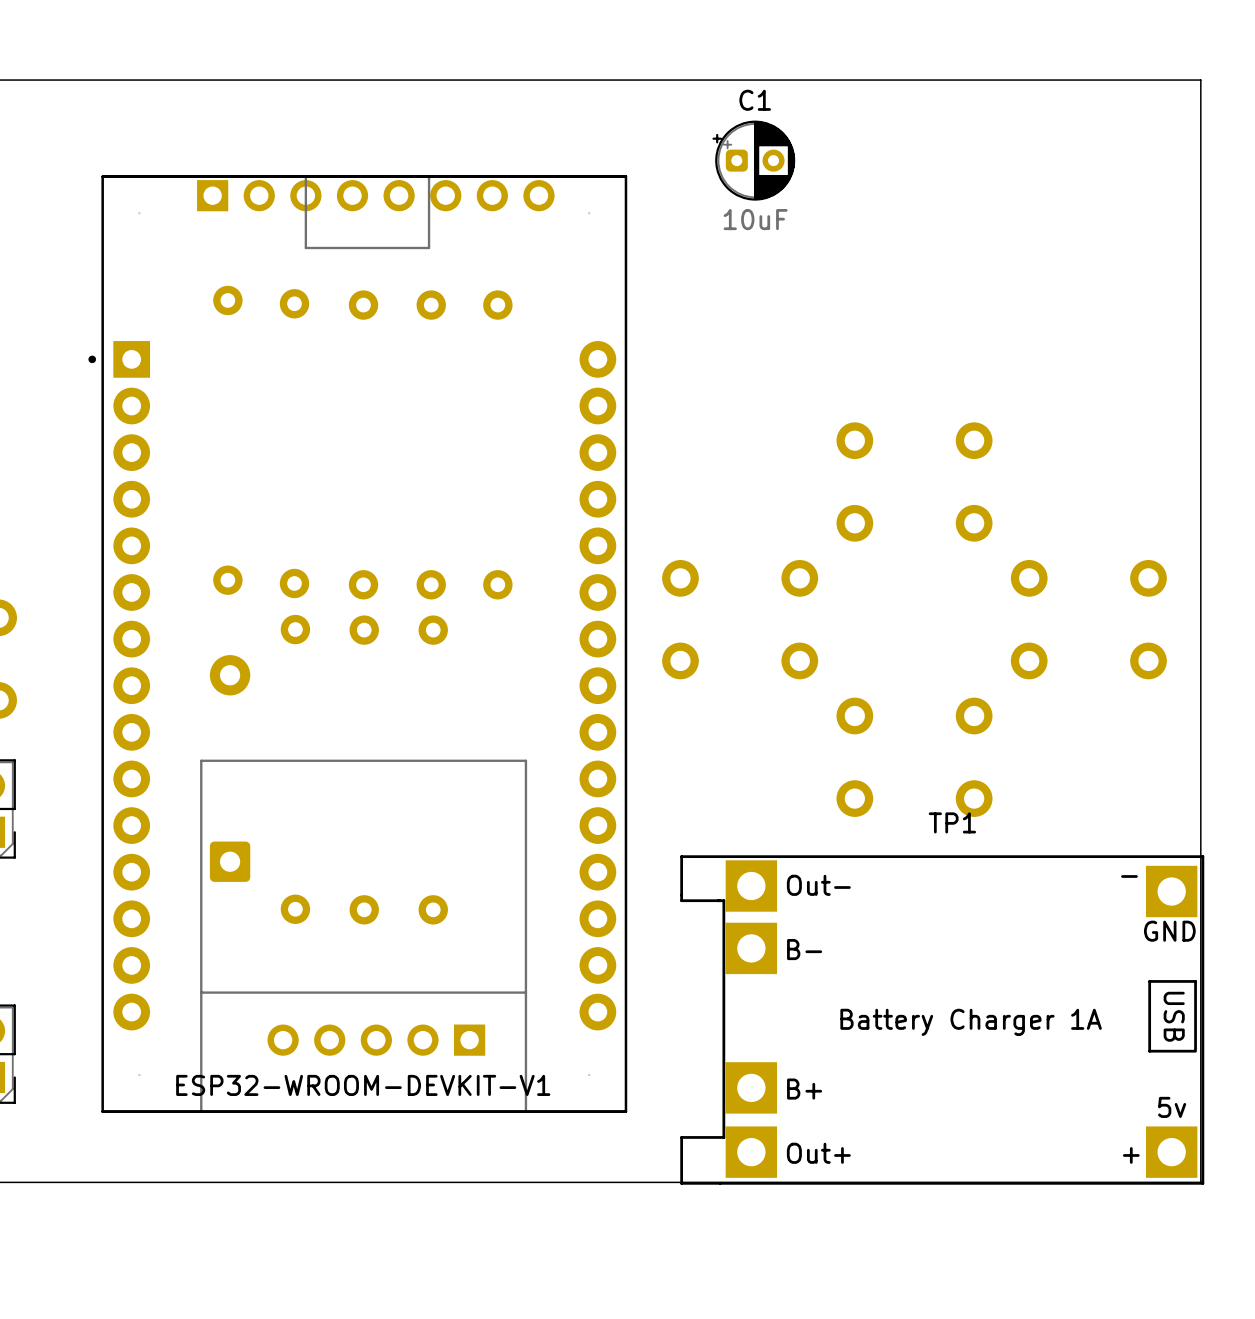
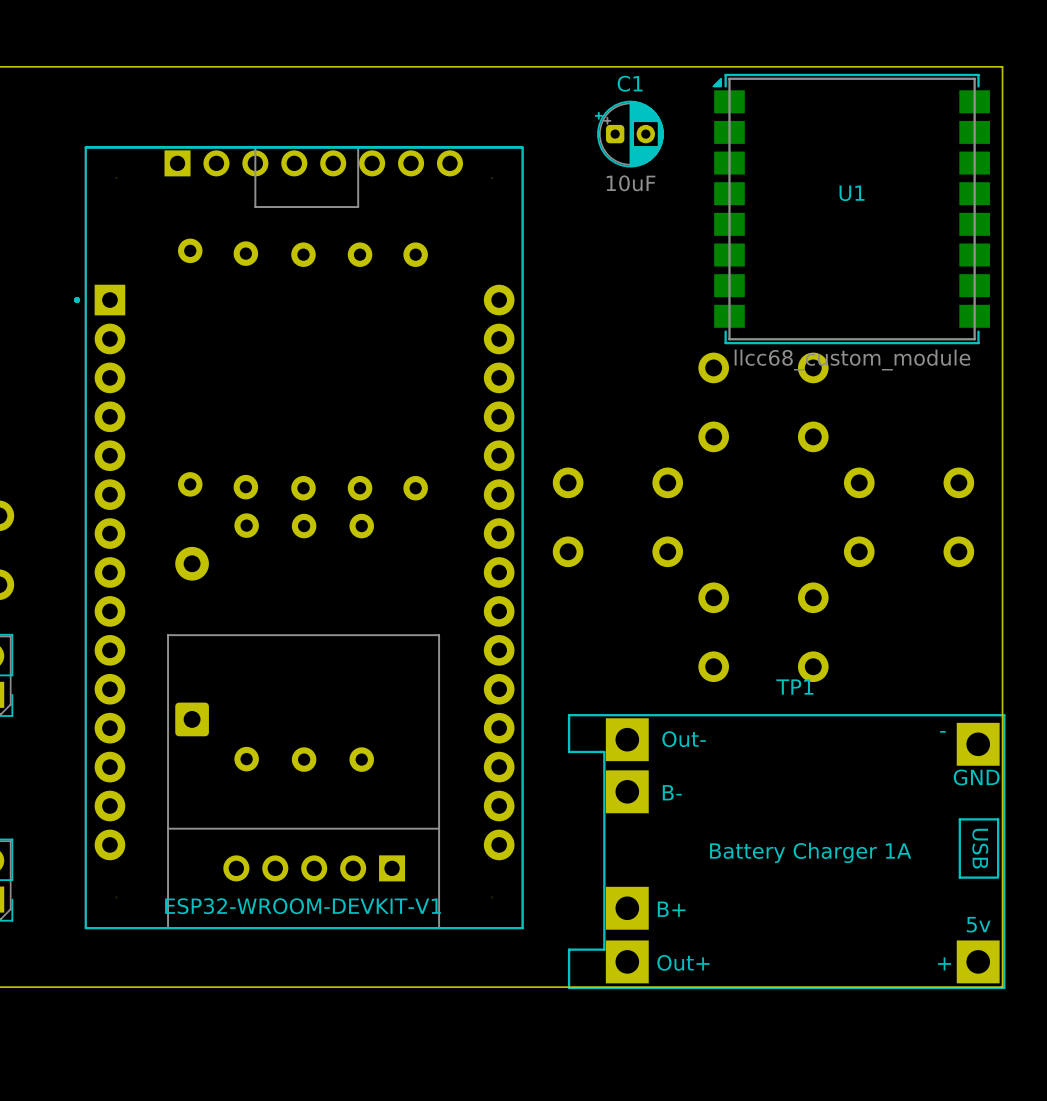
U1: none -> llcc68_custom_module (851, 209)

